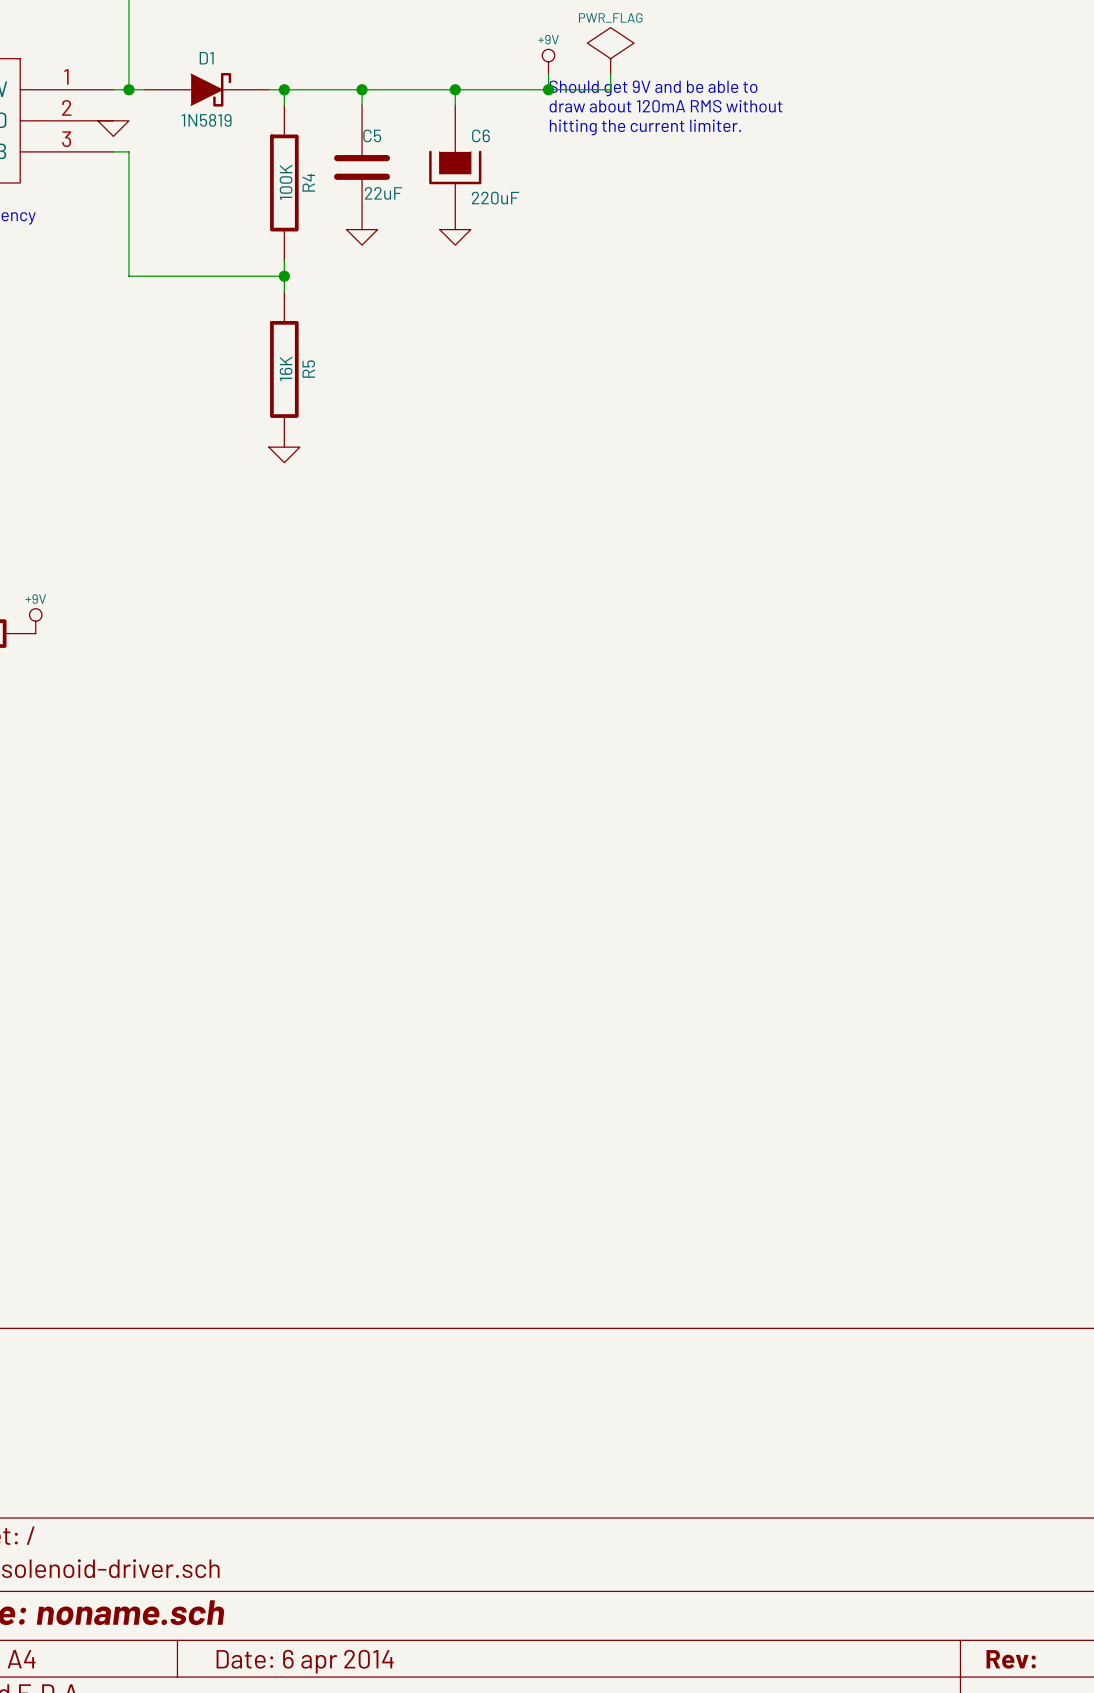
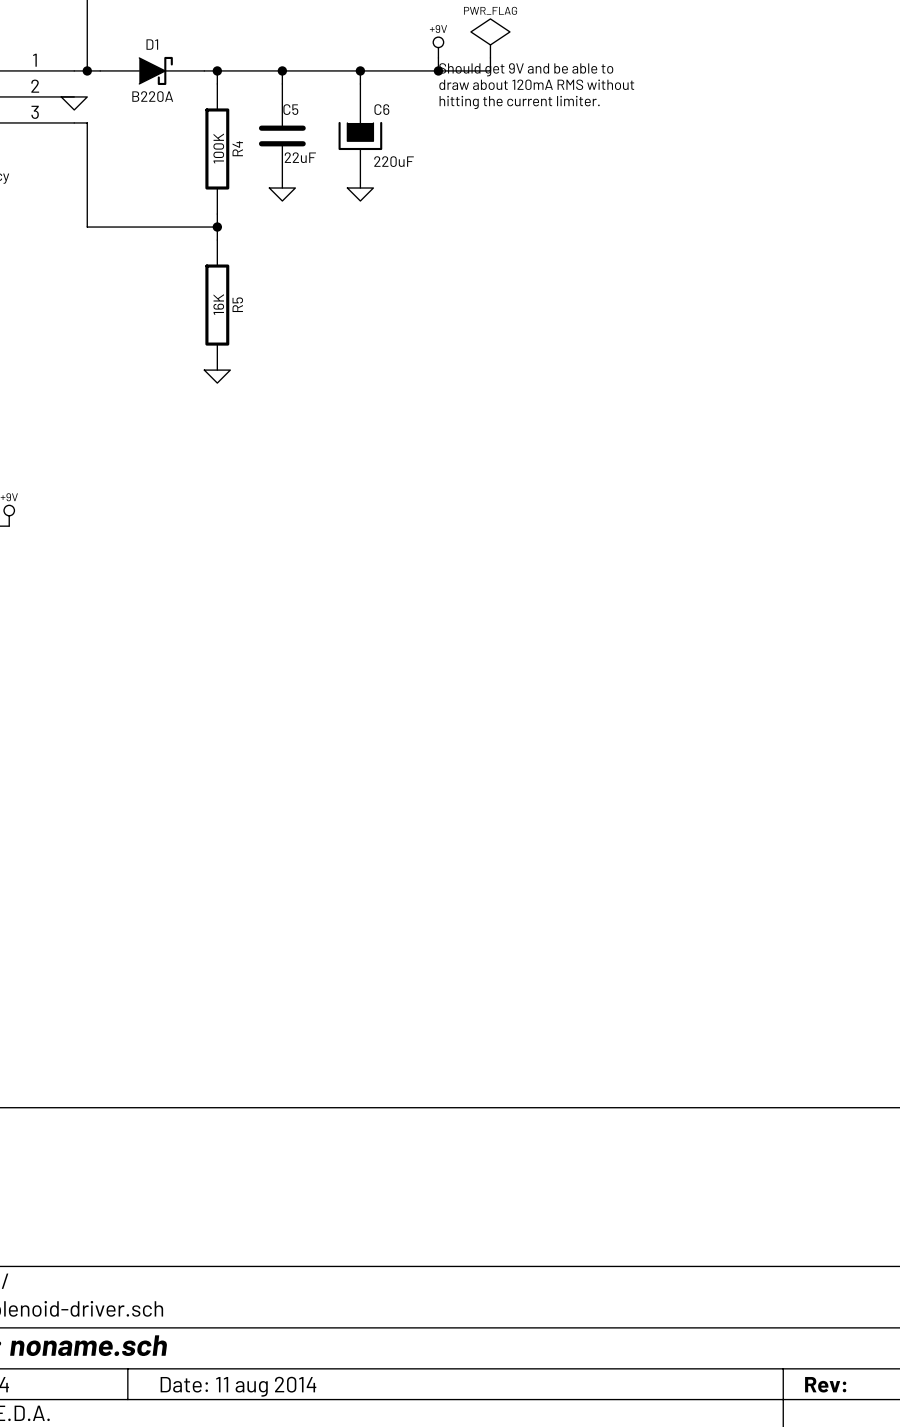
D1 value: 1N5819 (206, 120) -> B220A (152, 96)
title block: Date: 6 apr 2014 (305, 1661) -> Date: 11 aug 2014 (238, 1386)

